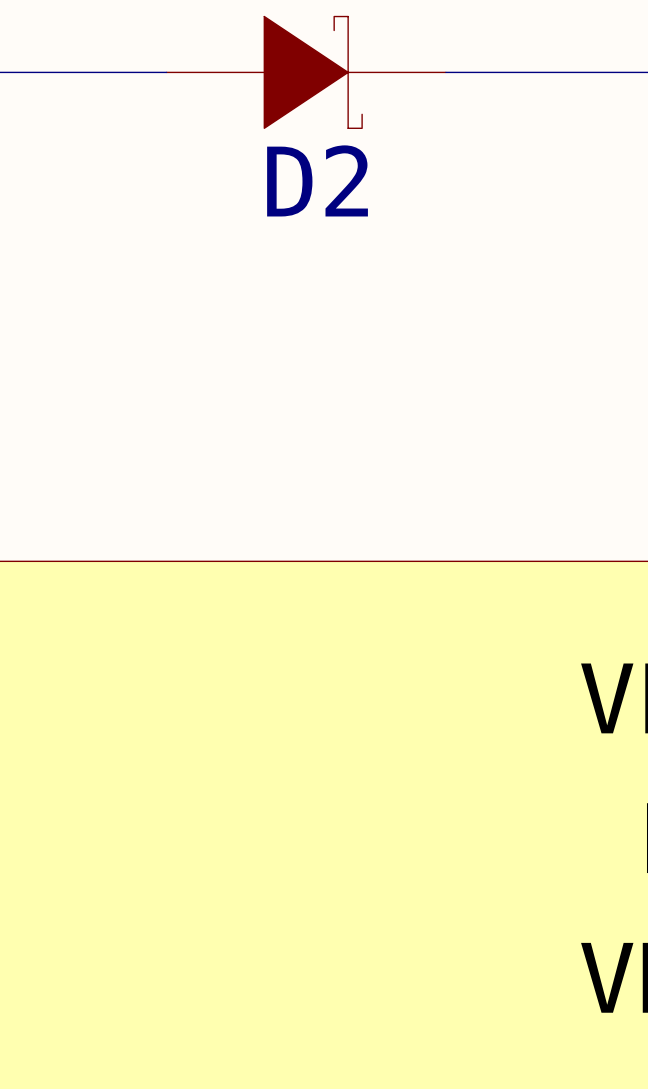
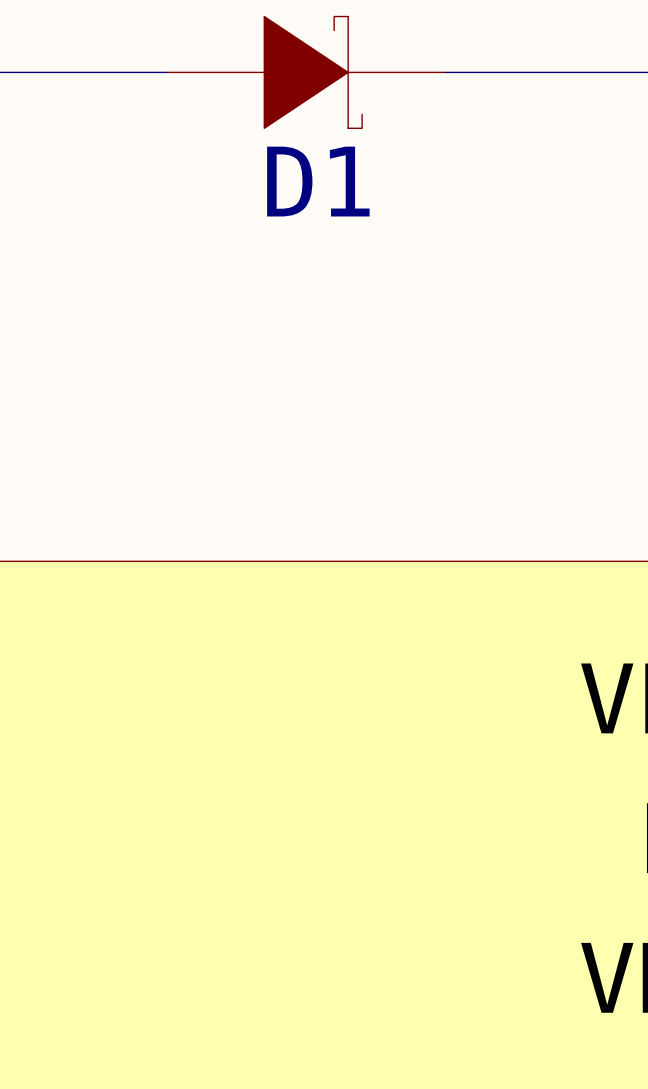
D2 name: D2 (317, 180) -> D1 (318, 181)

